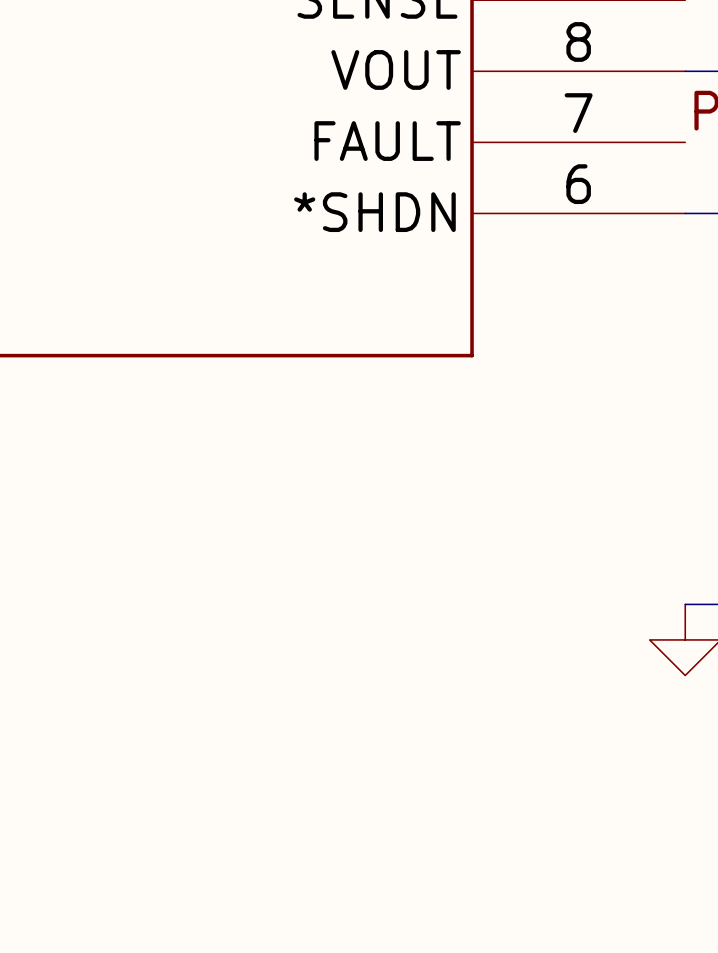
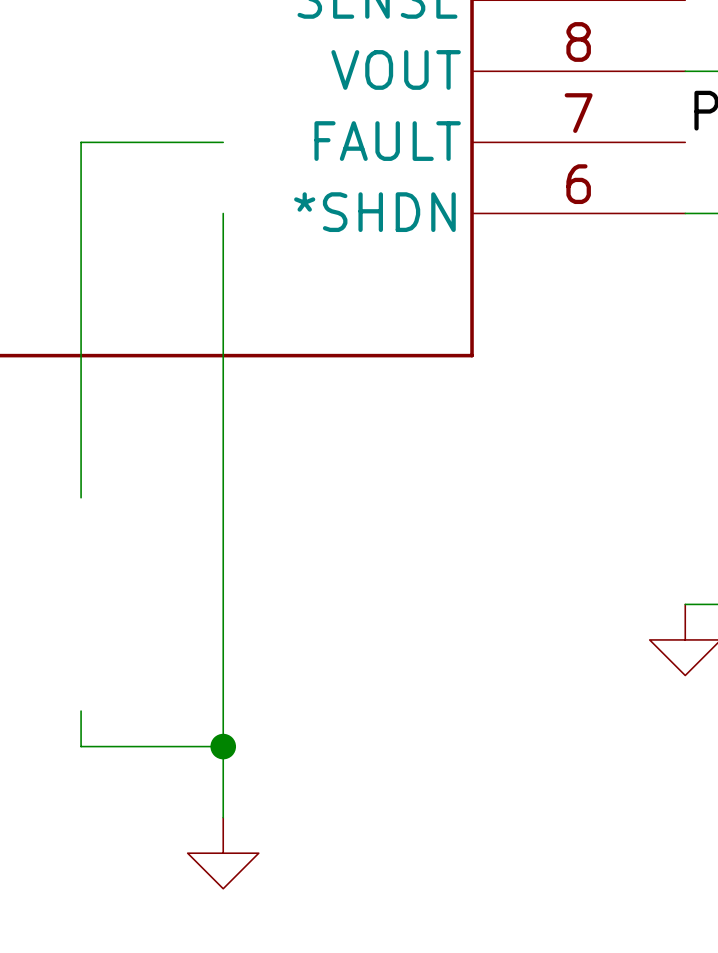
wire: none -> (223, 142) (81, 142) (81, 497)
wire: none -> (223, 213) (223, 817)
wire: none -> (81, 711) (81, 746) (223, 746)
junction: none -> (223, 746)
power symbol: none -> (223, 853)

